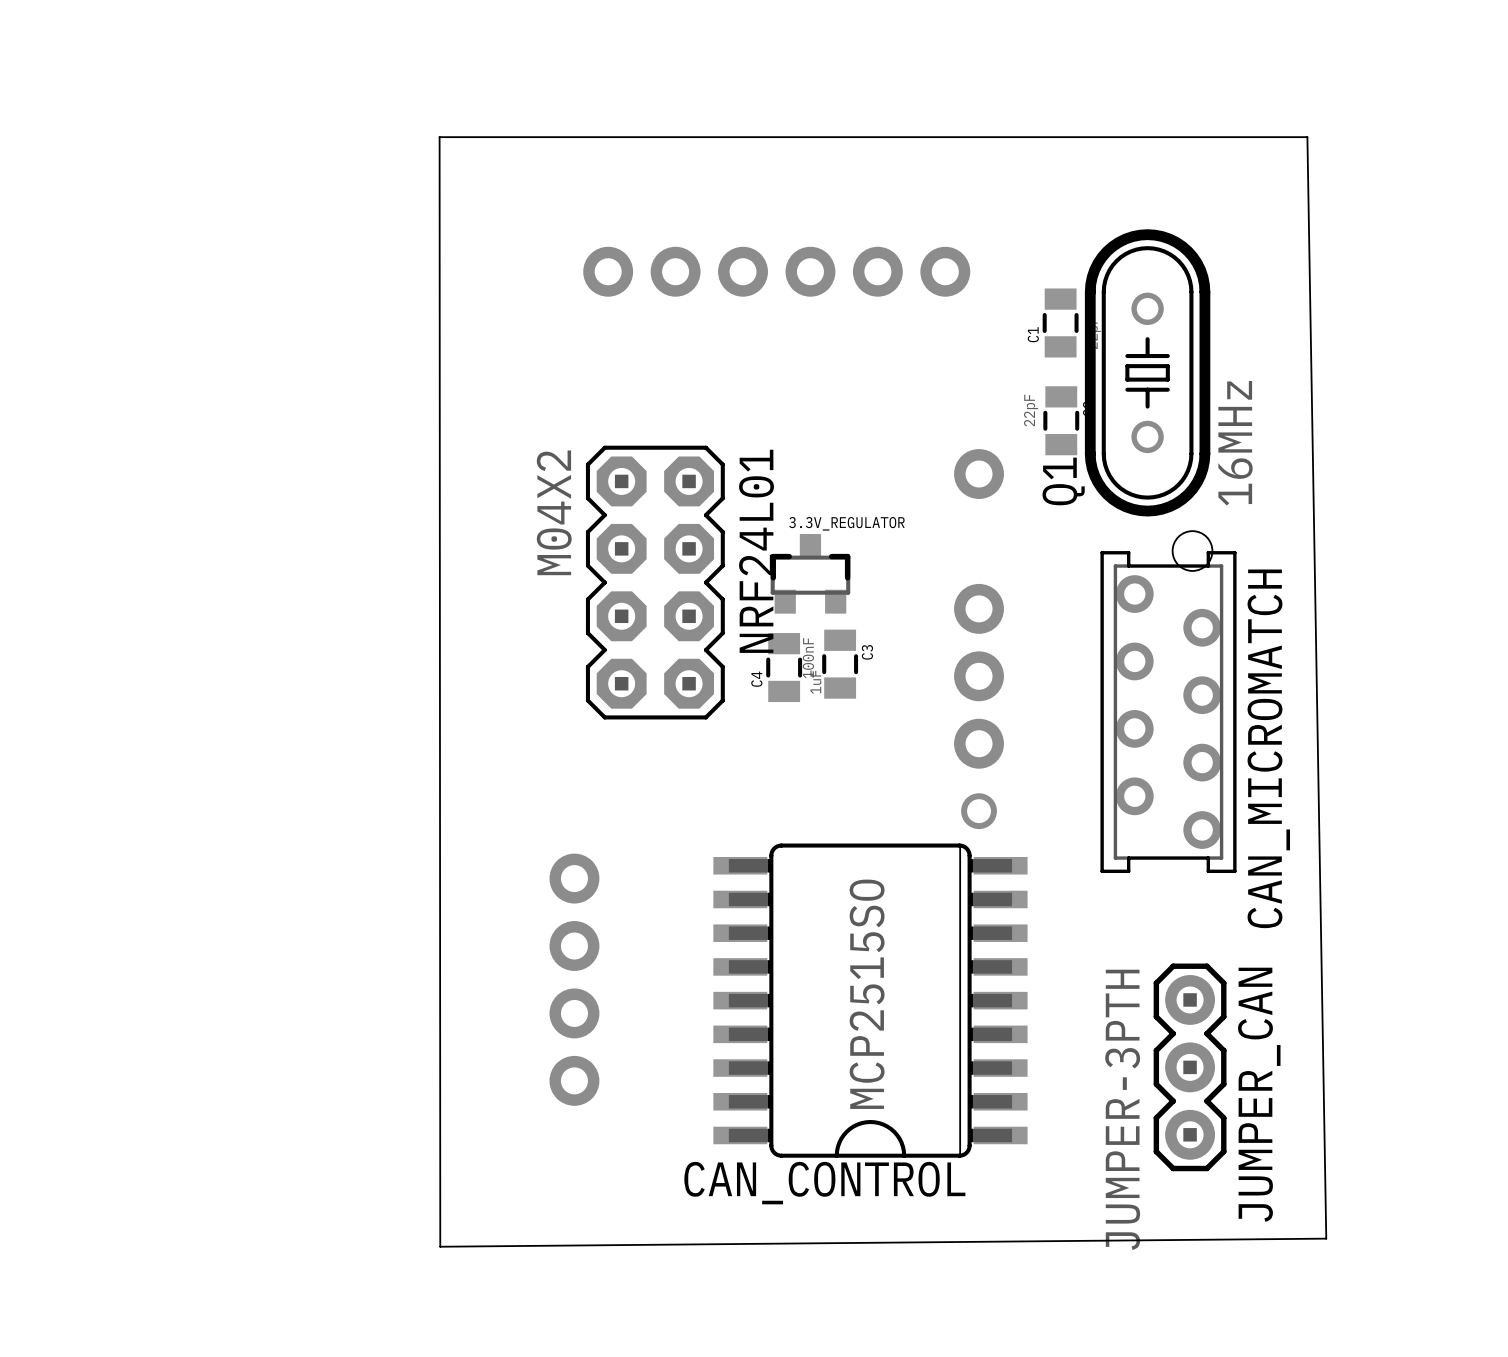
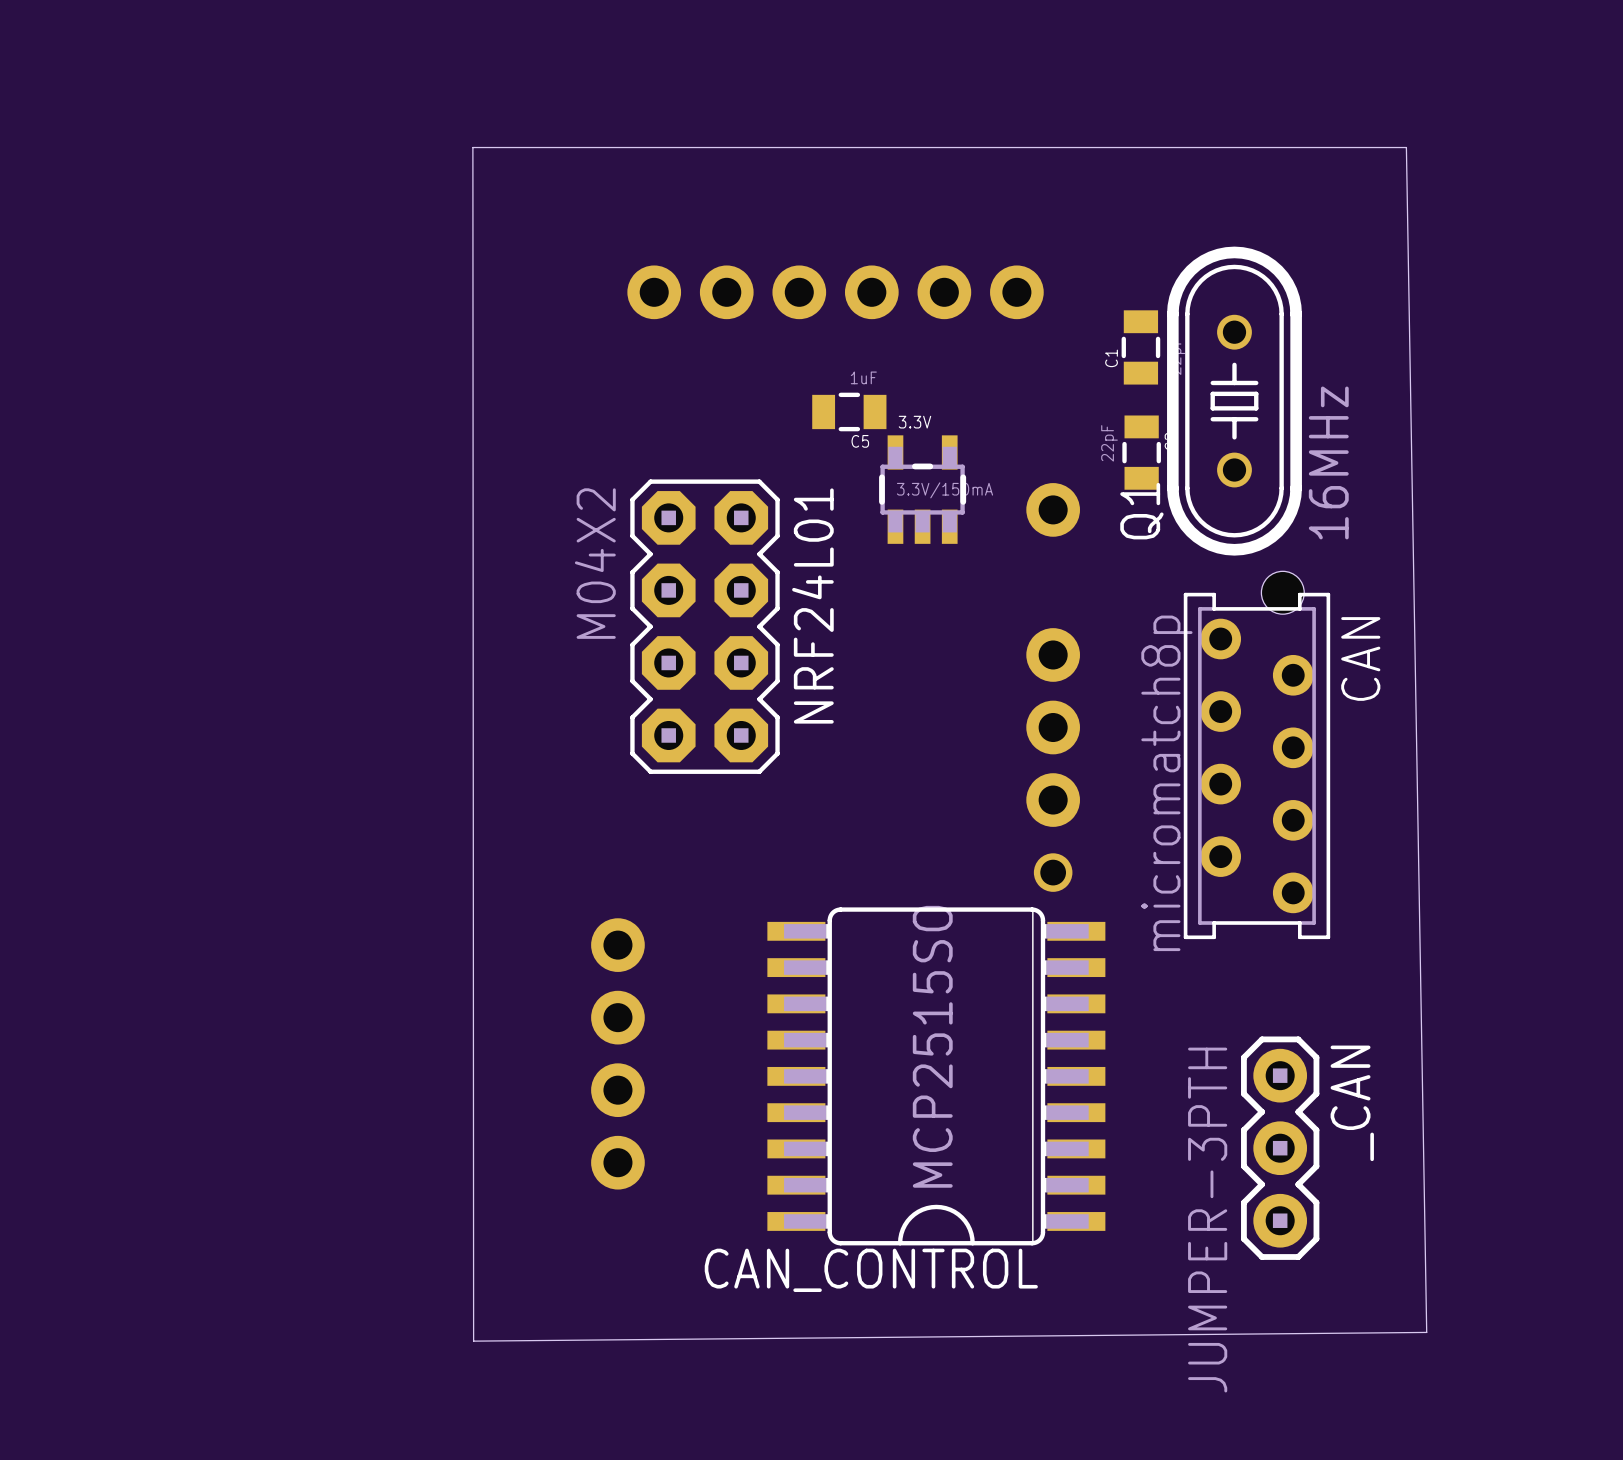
C5: none -> 1uF (849, 411)
3.3V: none -> 3.3V/150mA (922, 489)
3.3V_REGULATOR: (810, 573) -> none
C3: 100nF (840, 664) -> none
C4: 1uF (784, 667) -> none
CAN_MICROMATCH value: none -> micromatch8p (1166, 783)
CAN_MICROMATCH name: CAN_MICROMATCH (1268, 748) -> CAN (1360, 658)
JUMPER_CAN name: JUMPER_CAN (1259, 1094) -> _CAN (1352, 1103)

